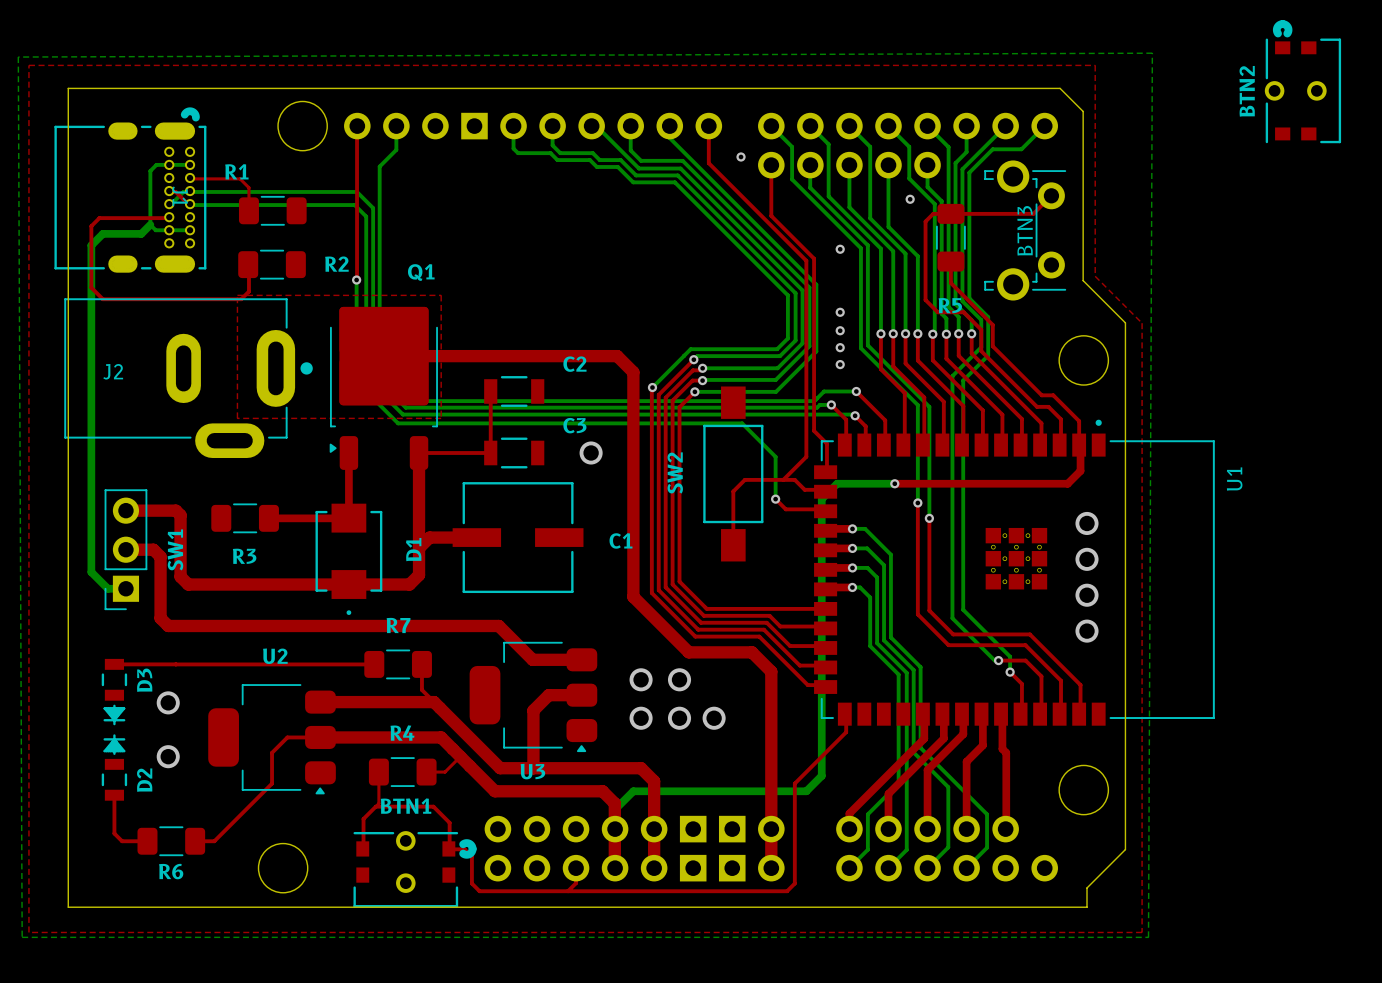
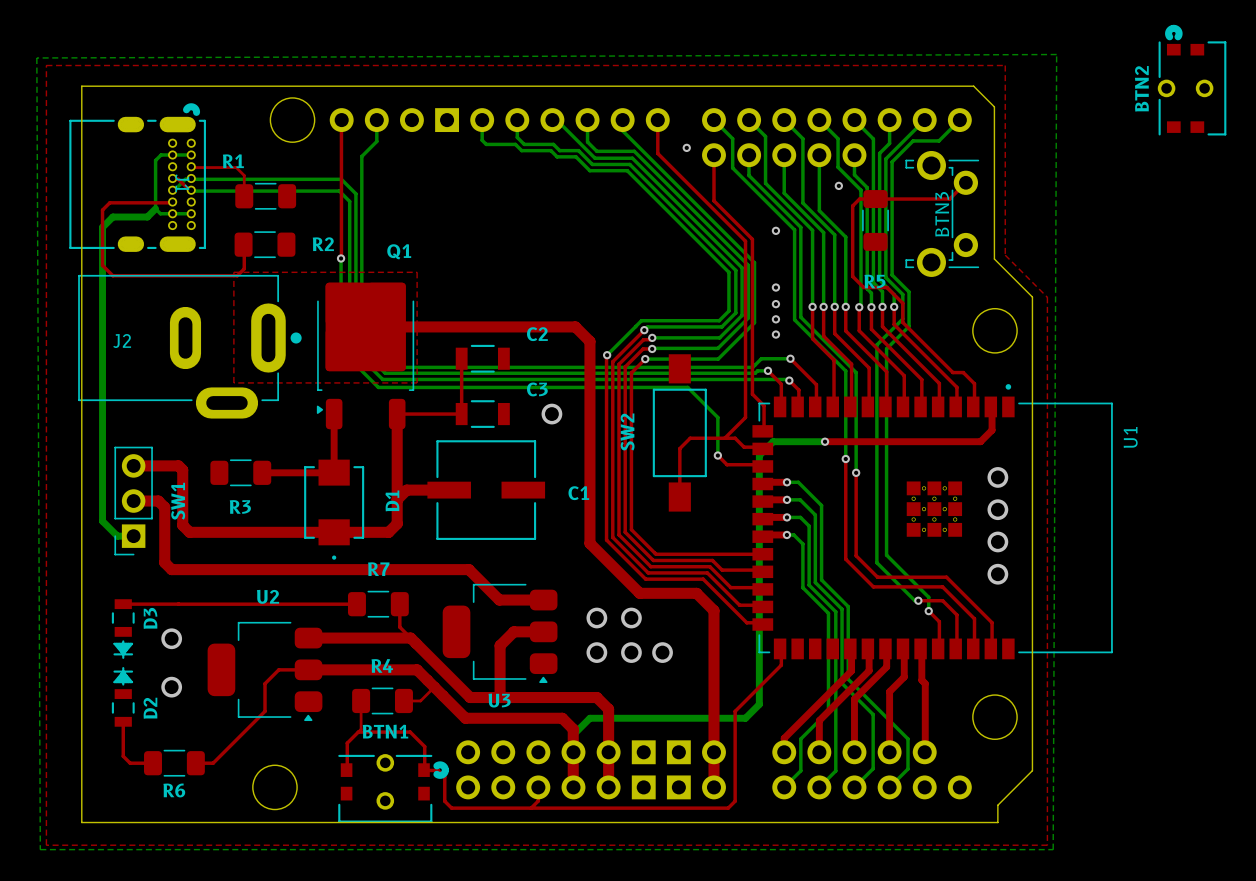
top track: (950, 261) (950, 283) (992, 324) (992, 346) (1041, 395) (1053, 395) (1079, 421) (1079, 445) -> none

